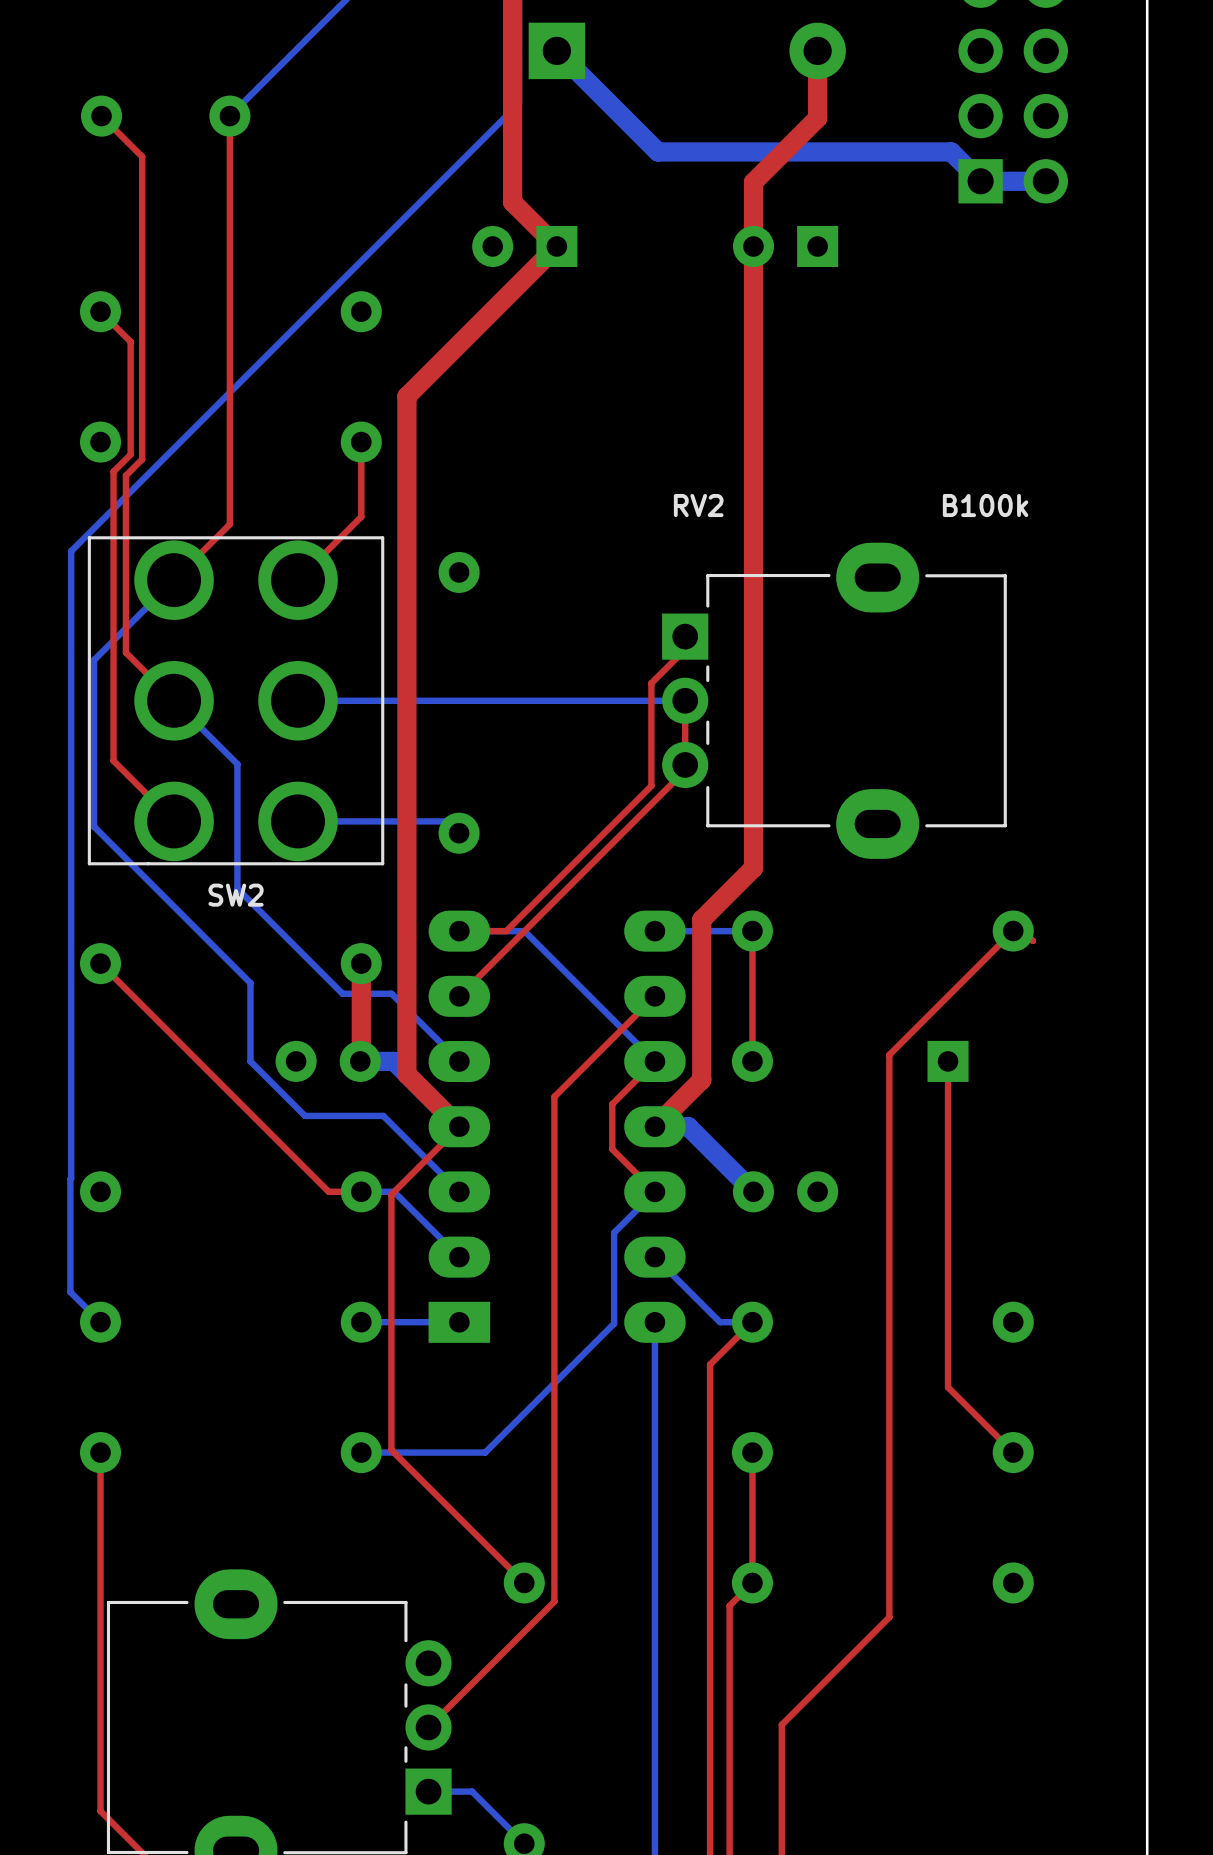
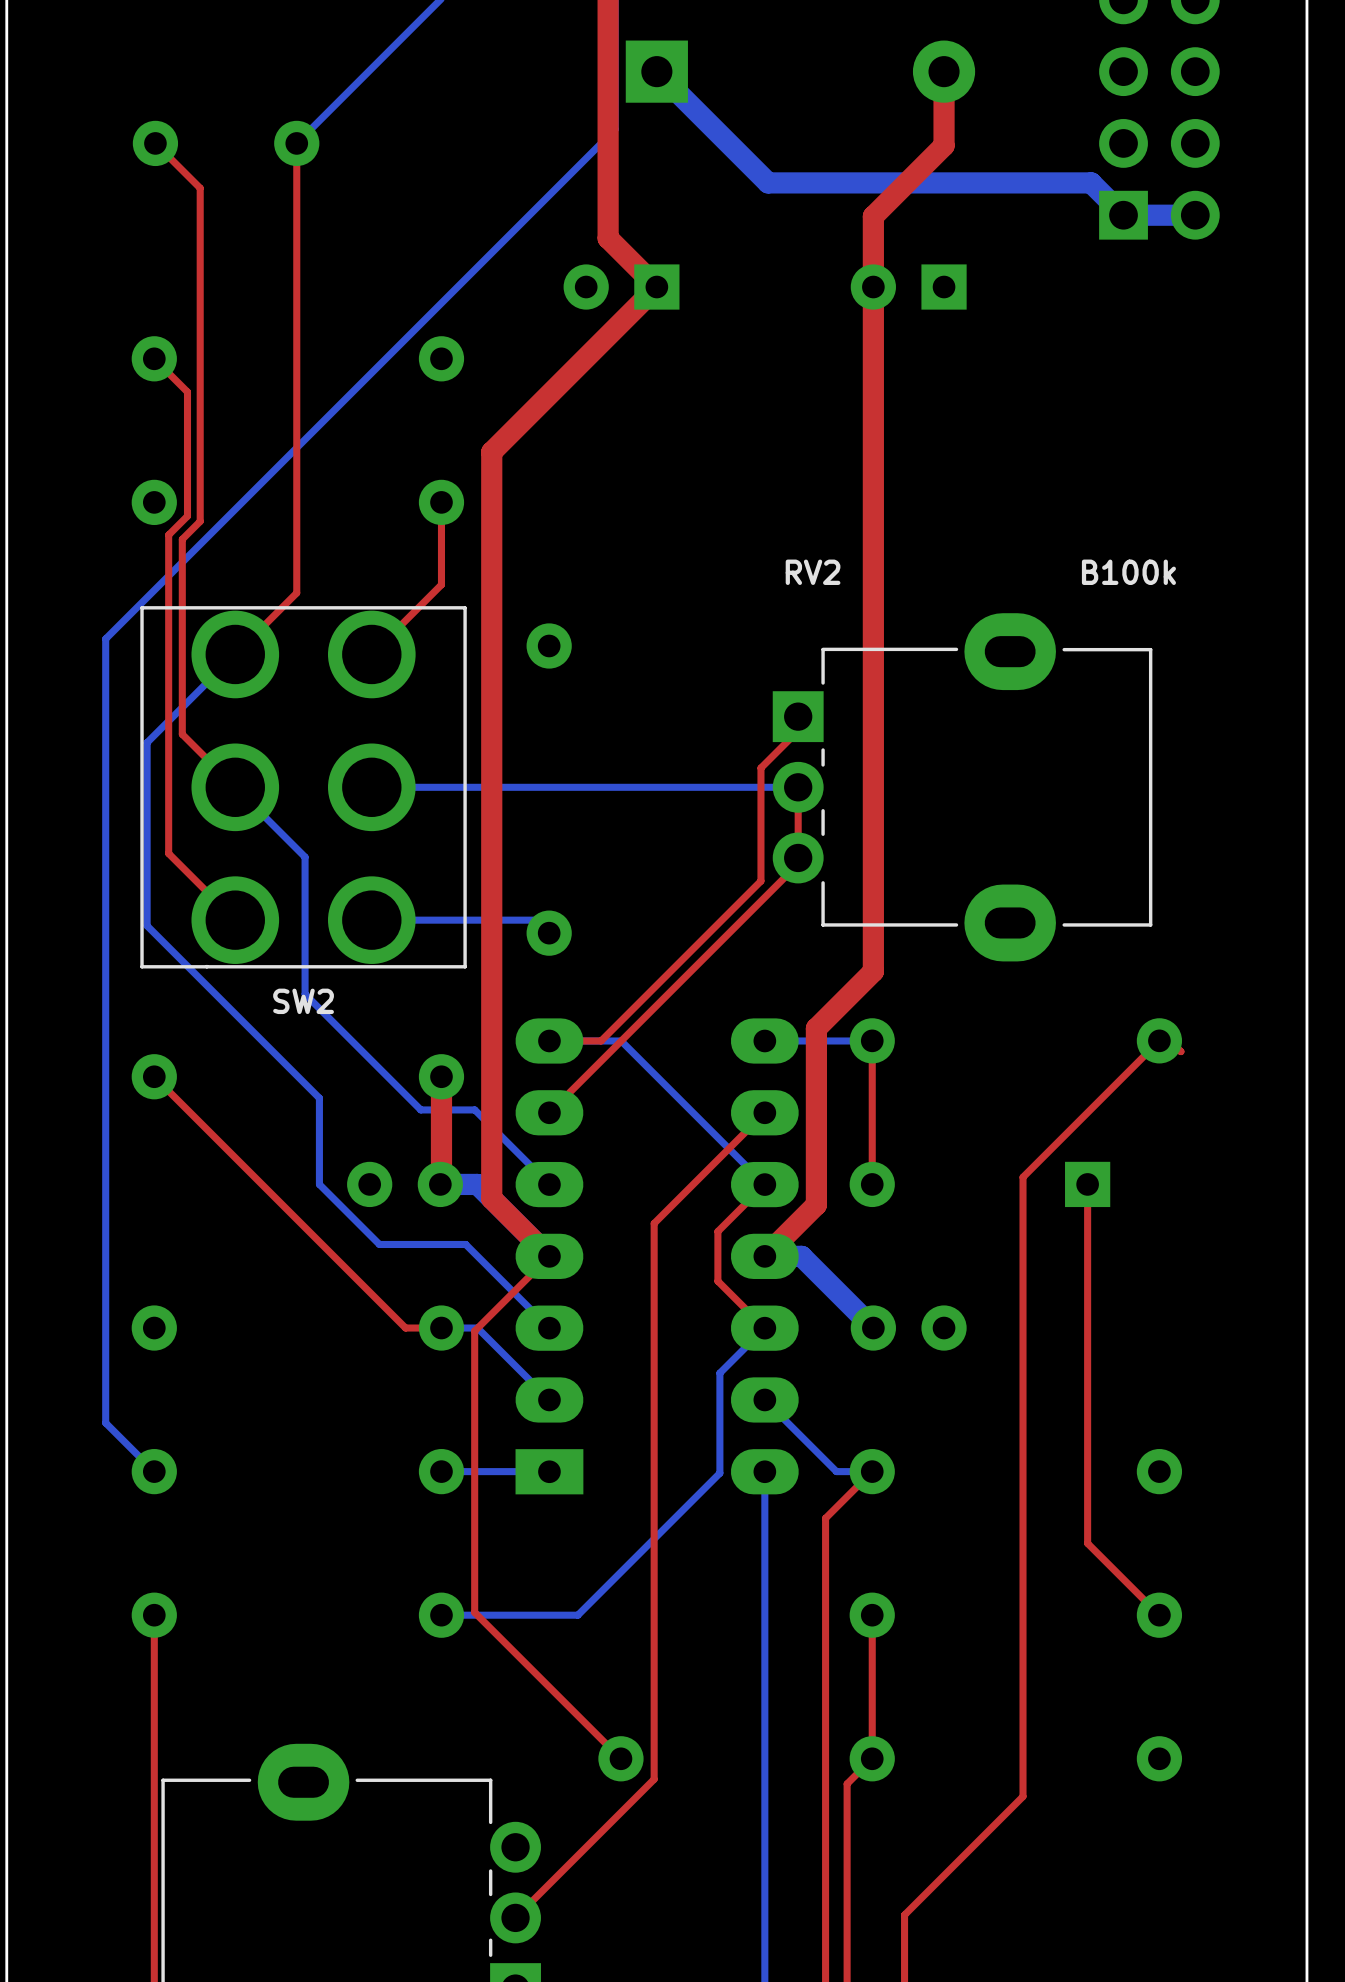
bottom track: (71, 551) (70, 1292) -> (122, 622) (105, 638) (105, 1422) (121, 1438)

